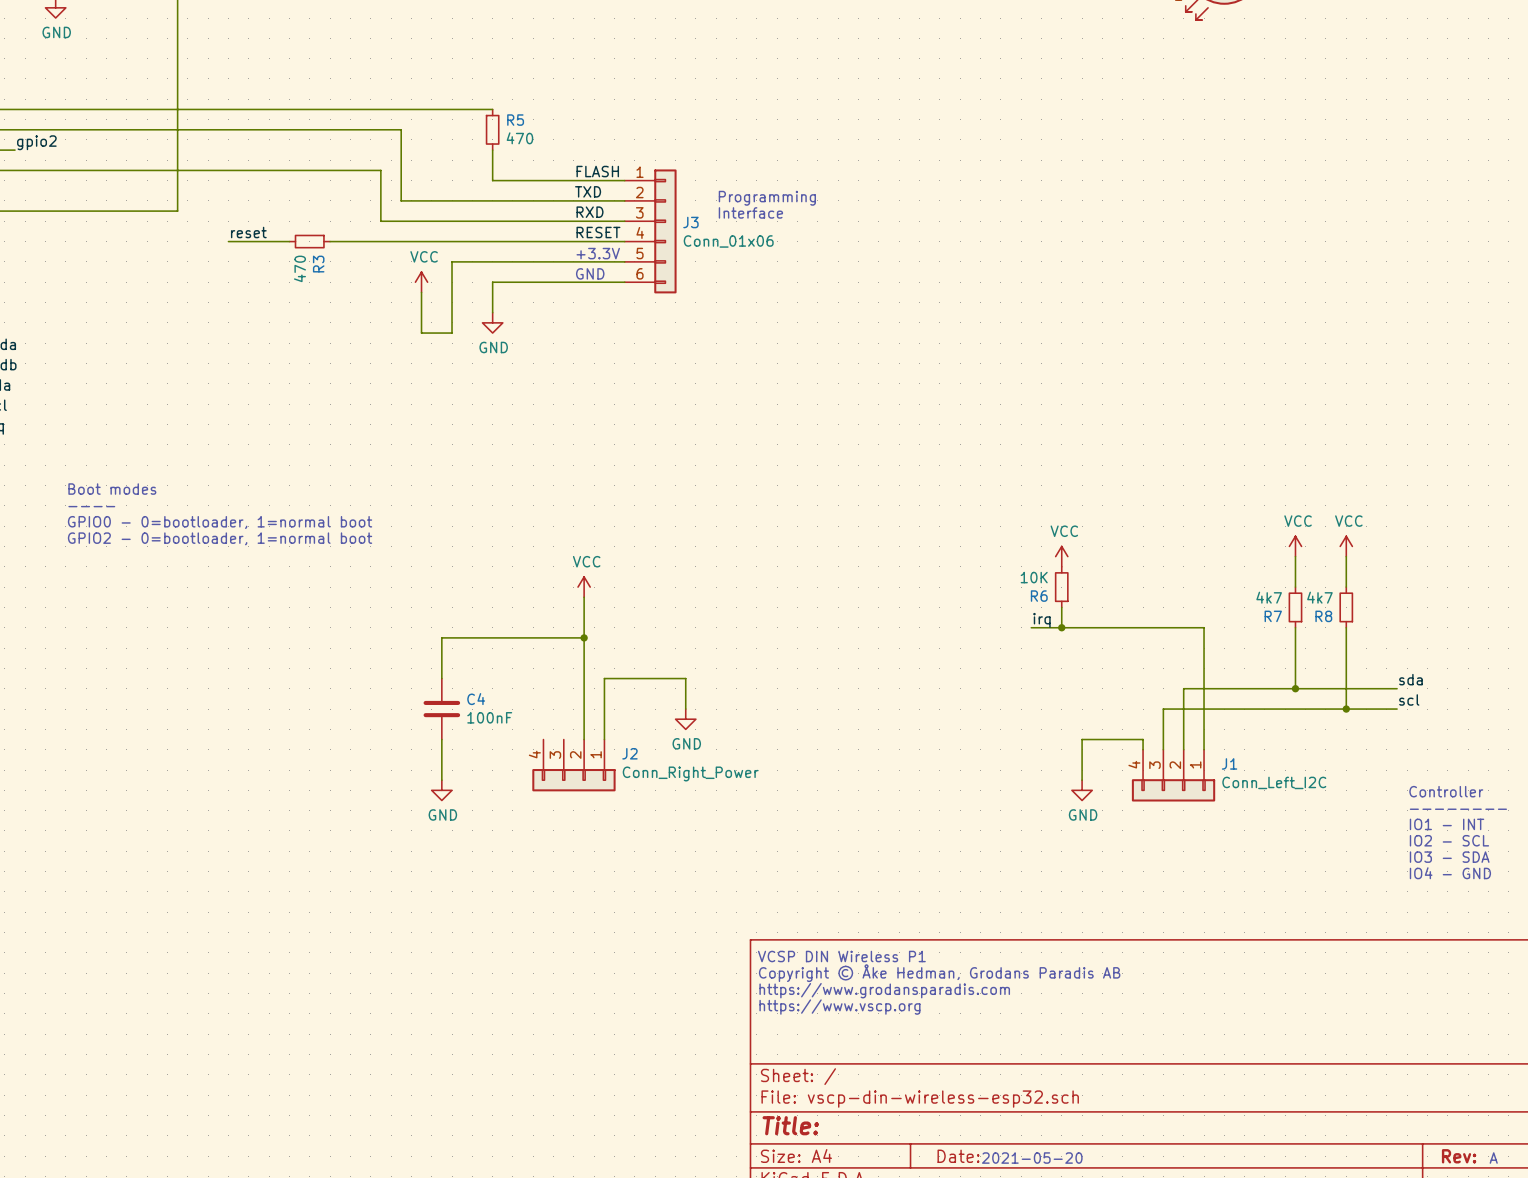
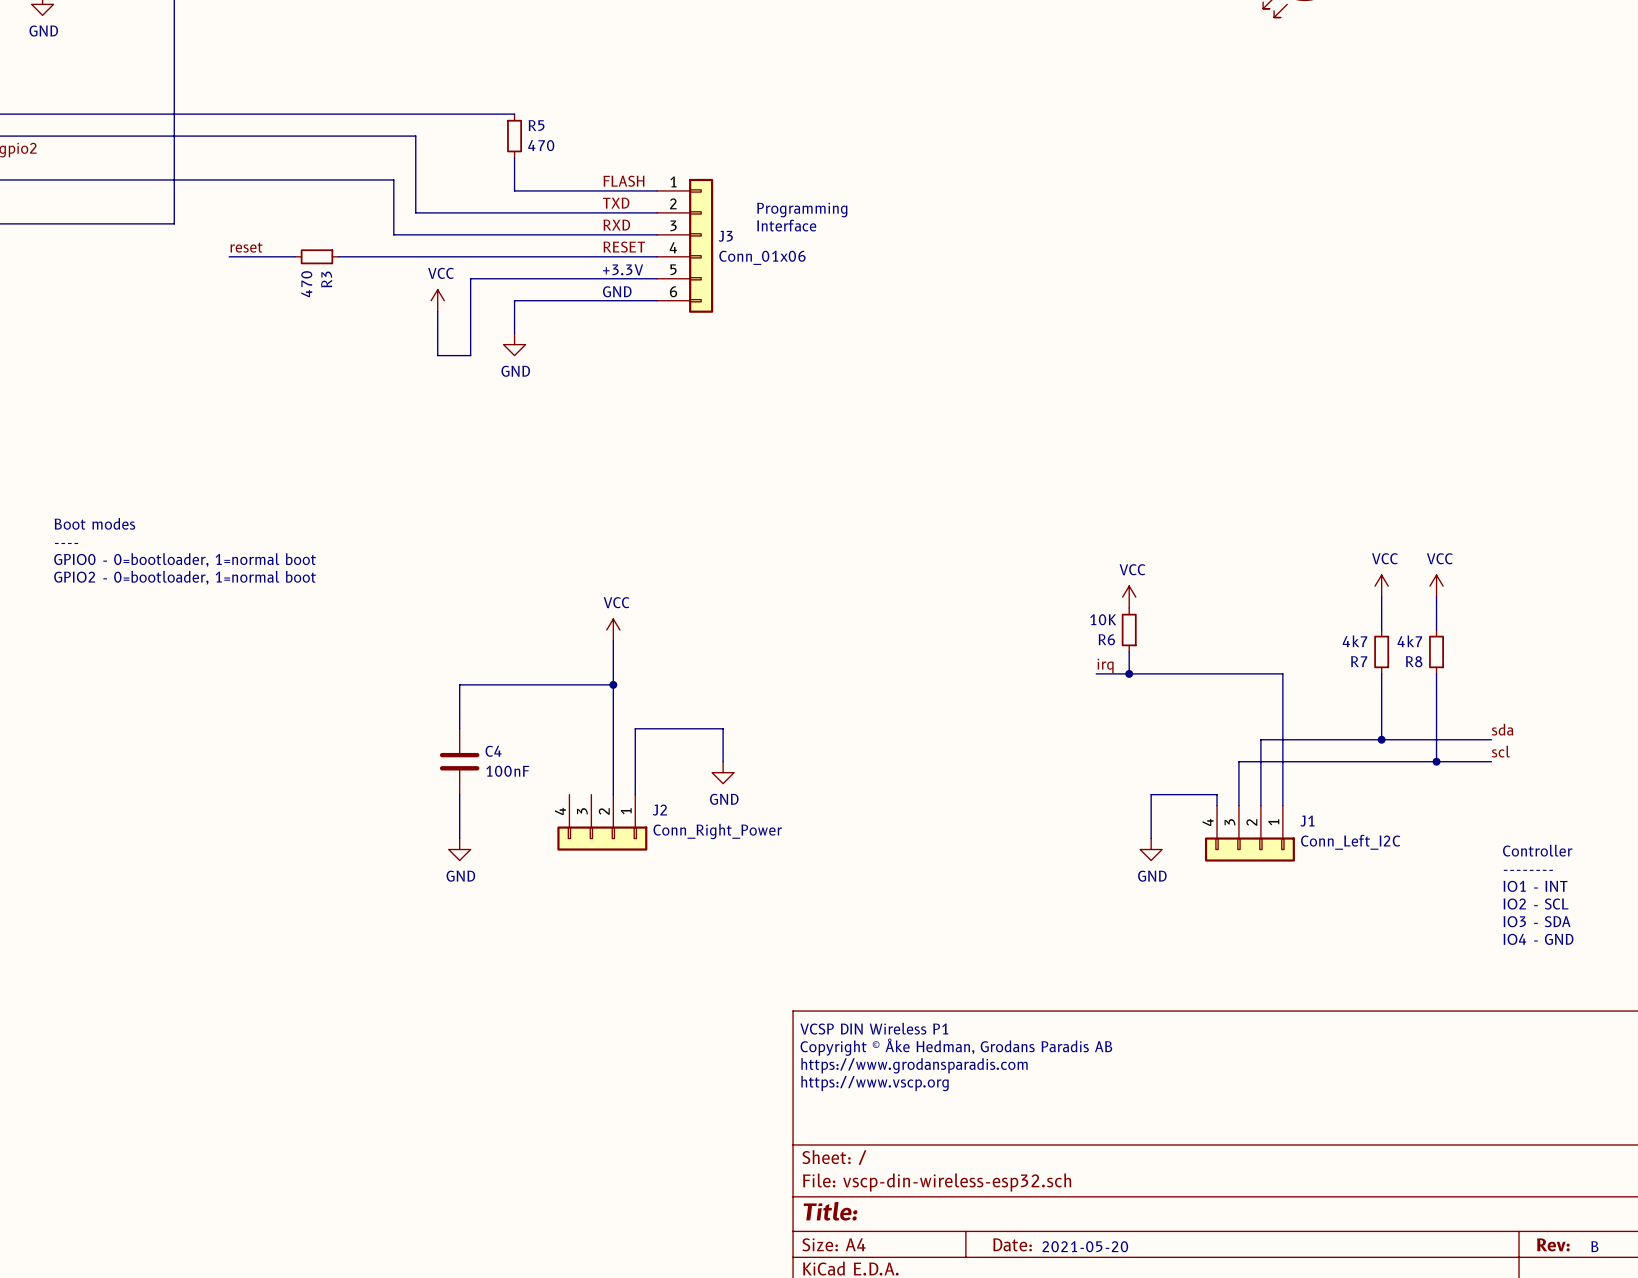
text: A (1493, 1158) -> B (1594, 1246)

